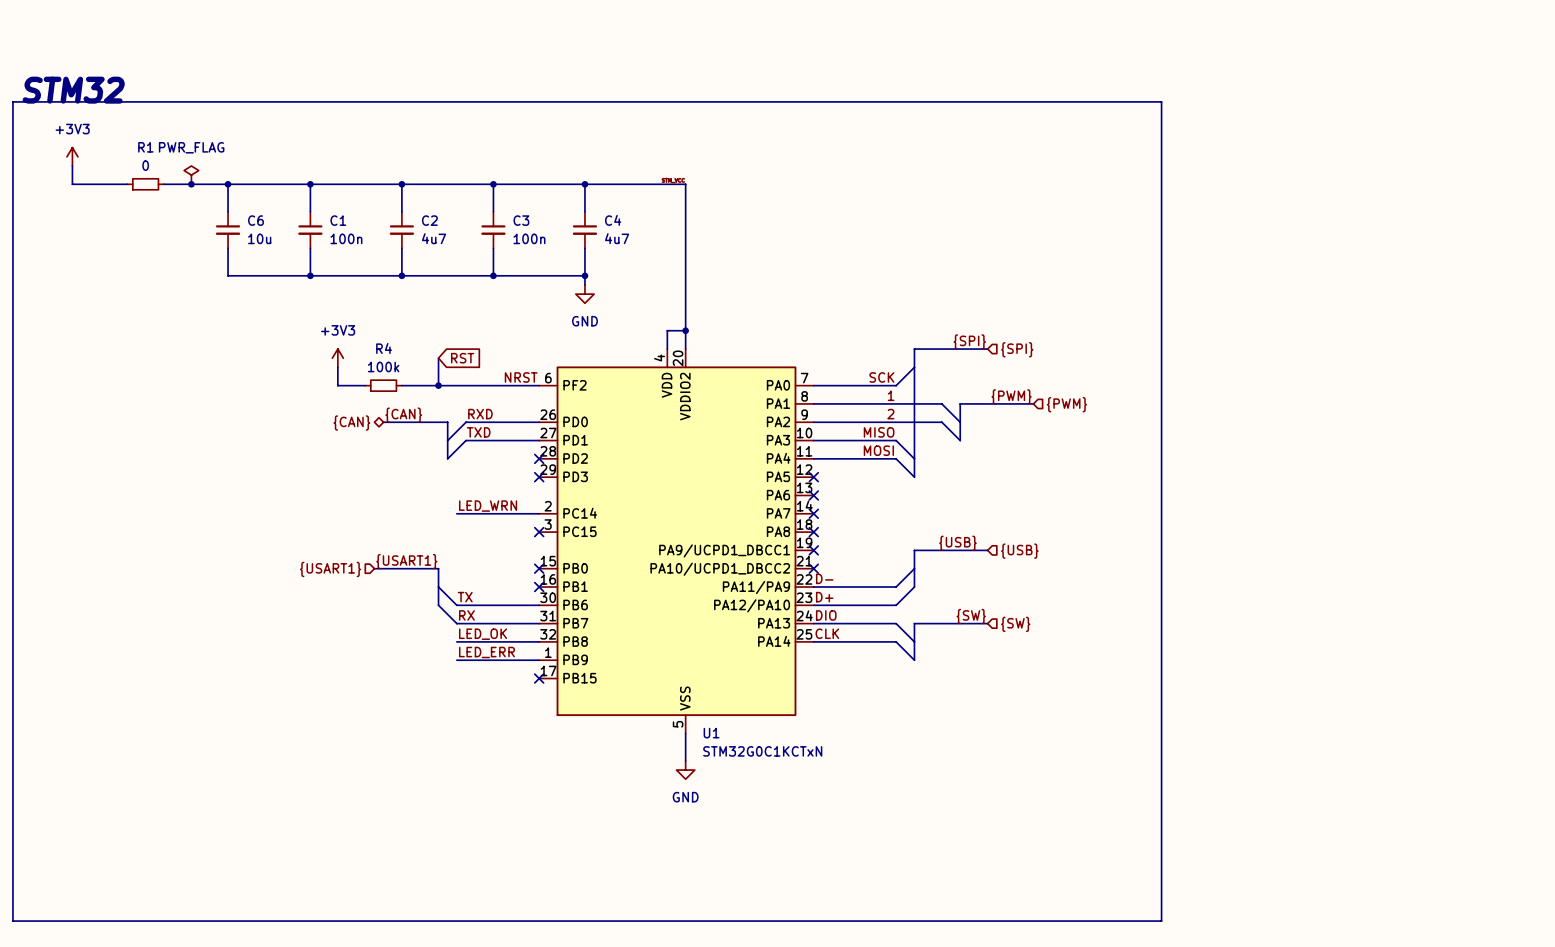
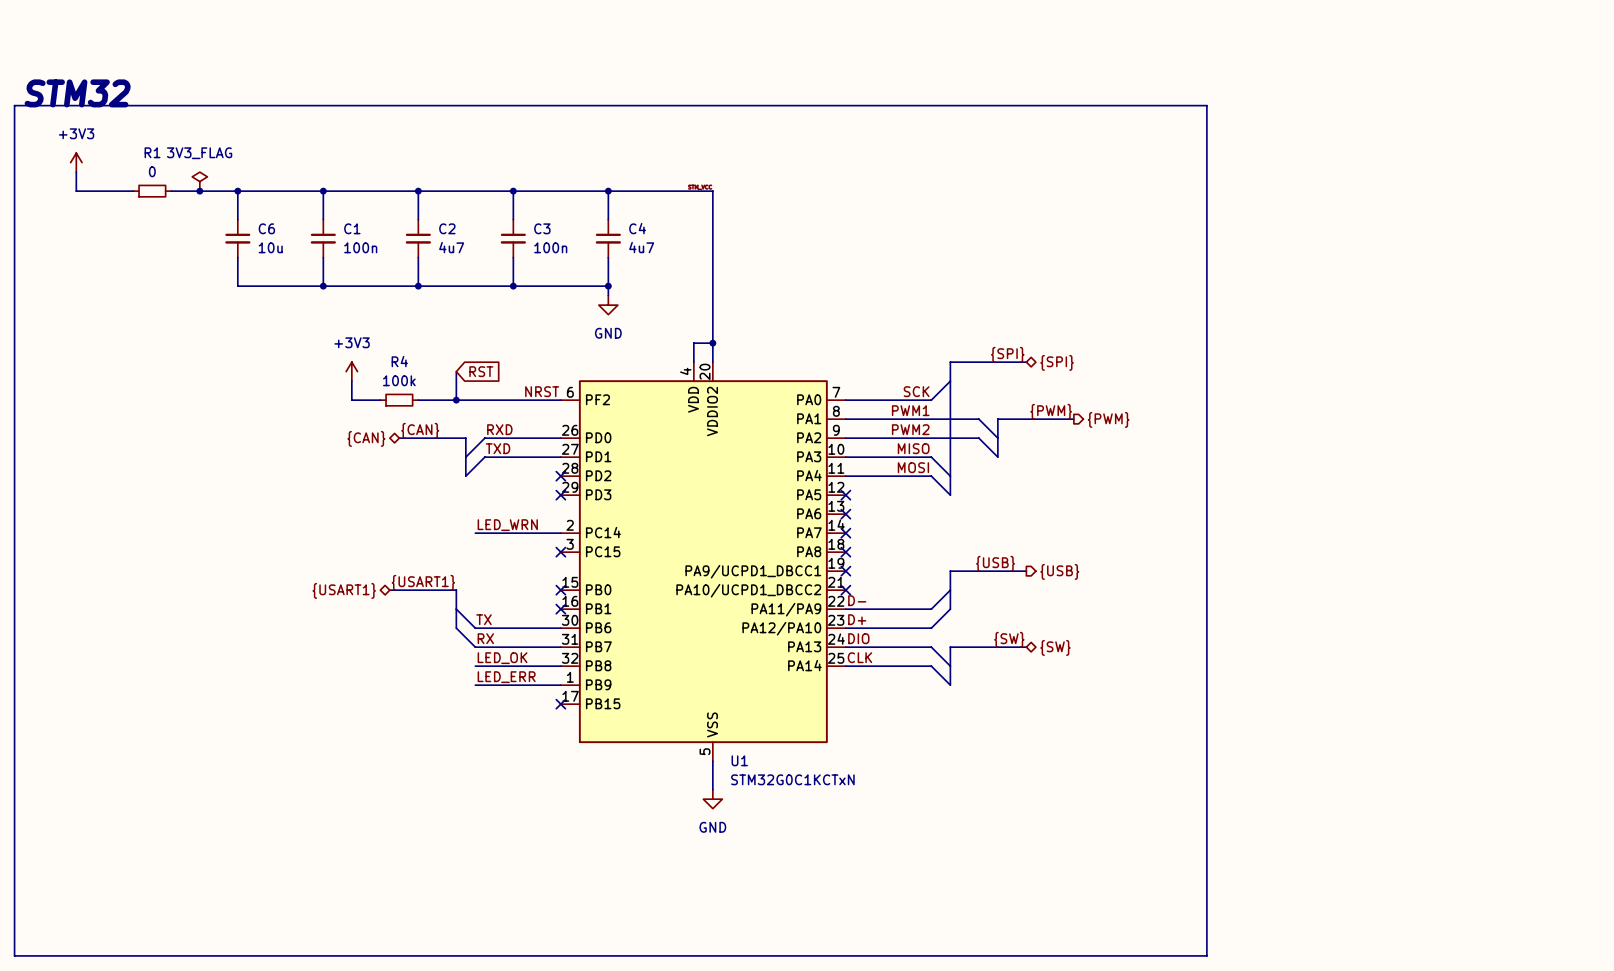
power symbol: PWR_FLAG (191, 175) -> 3V3_FLAG (199, 181)
hierarchical label shape: input (1017, 349) -> bidirectional (1057, 362)
label: 1 (891, 395) -> PWM1 (910, 410)
hierarchical label shape: input (1066, 404) -> output (1108, 419)
label: 2 (890, 414) -> PWM2 (910, 429)
hierarchical label shape: input (1019, 551) -> output (1059, 571)
hierarchical label shape: input (330, 569) -> bidirectional (344, 590)
hierarchical label shape: input (1015, 624) -> bidirectional (1055, 647)

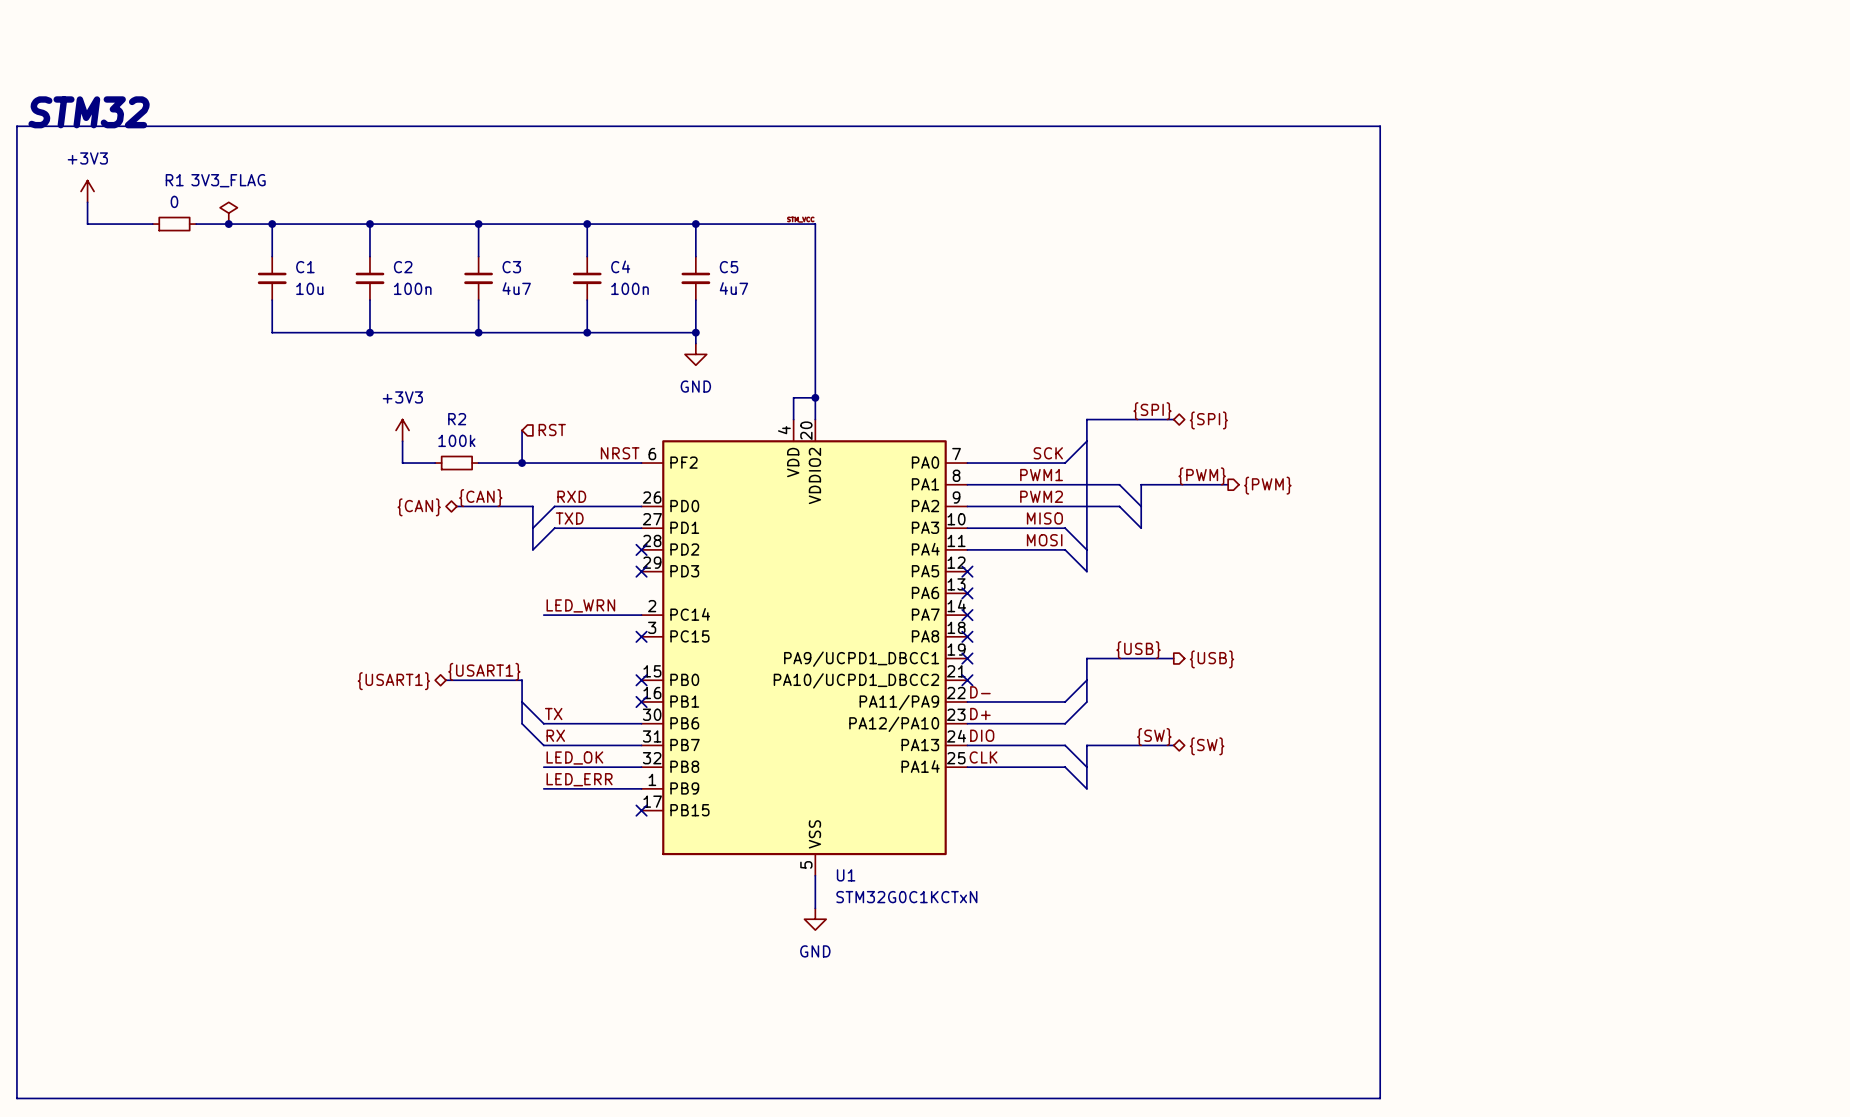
C6 name: C6 (266, 228) -> C1 (305, 267)
C1 name: C1 (352, 228) -> C2 (403, 267)
C2 name: C2 (447, 228) -> C3 (511, 267)
C3 name: C3 (542, 228) -> C4 (620, 266)
C4 name: C4 (637, 228) -> C5 (729, 267)
R4 name: R4 (399, 361) -> R2 (457, 419)
global label: RST (481, 371) -> none
hierarchical label: none -> RST (552, 430)

